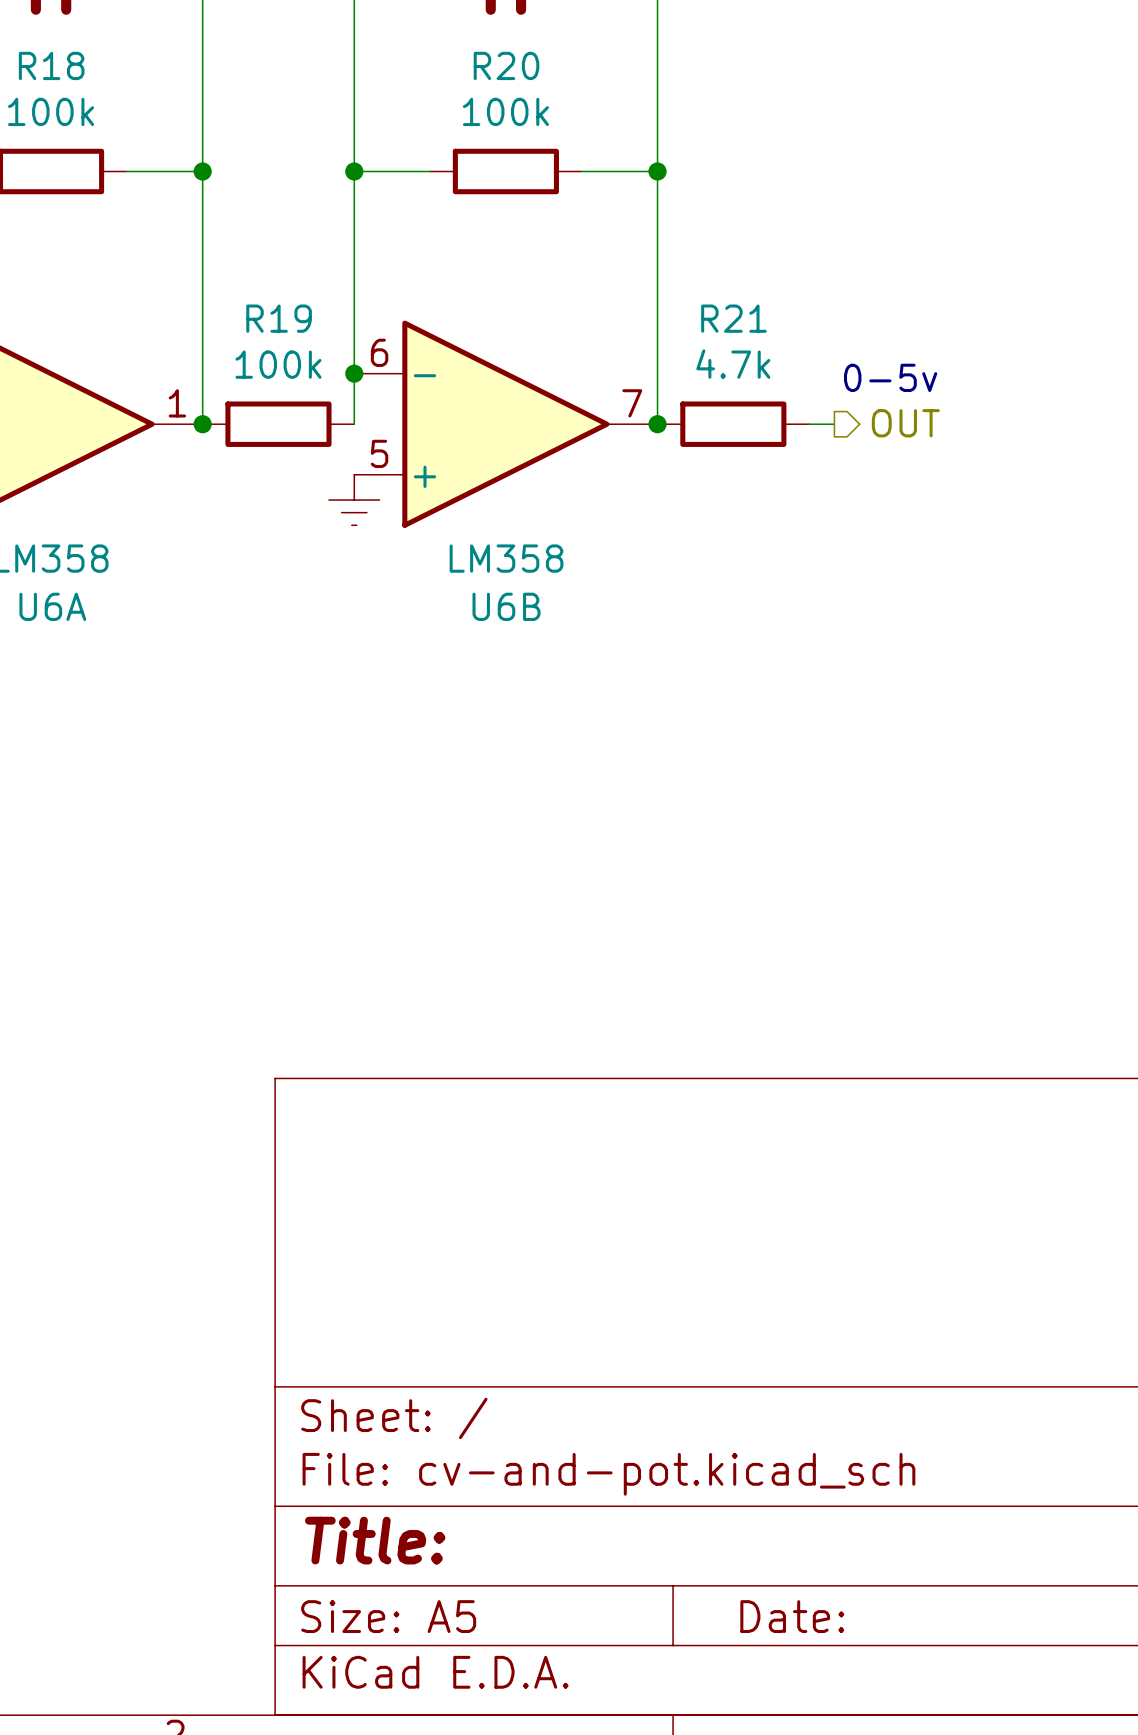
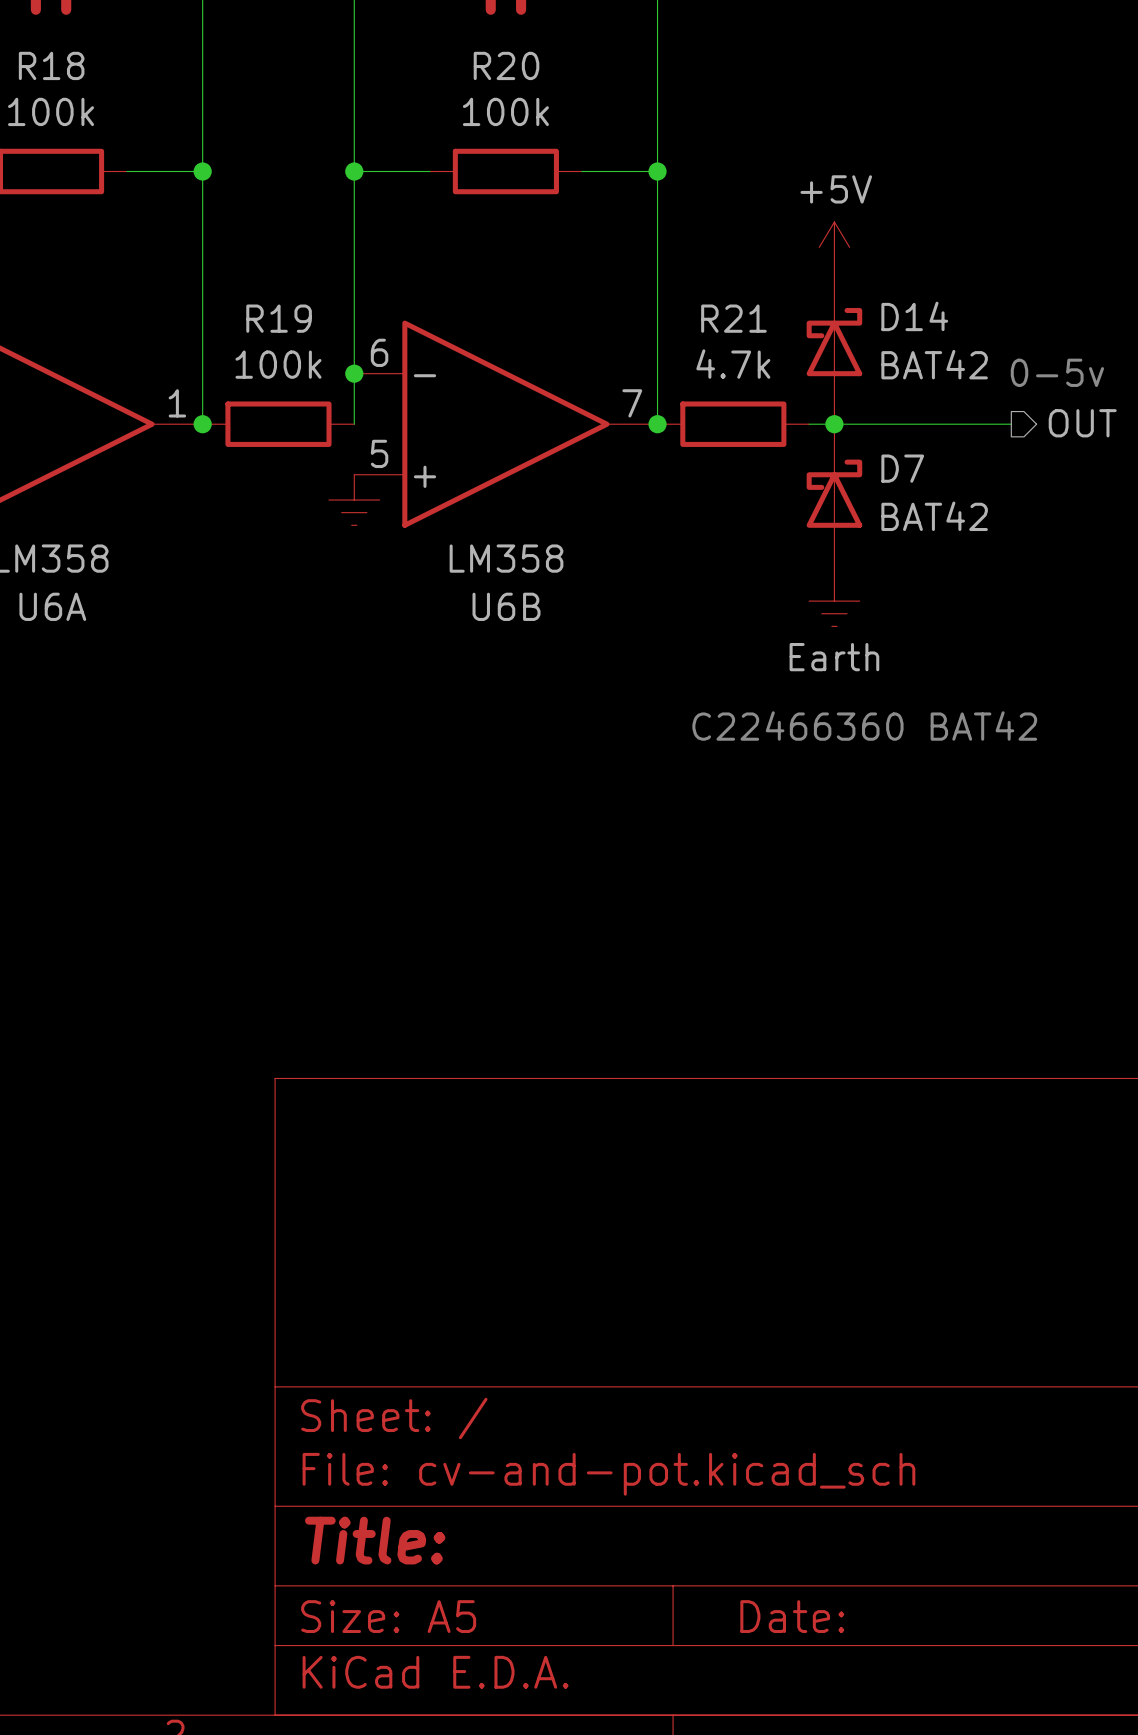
power symbol: none -> +5V (834, 247)
D14: none -> BAT42 (834, 348)
text position: 0-5v (890, 377) -> 0-5v (1057, 372)
hierarchical label position: OUT (905, 423) -> OUT (1082, 423)
wire: none -> (834, 424) (1011, 424)
junction: none -> (834, 424)
D7: none -> BAT42 (834, 500)
power symbol: none -> Earth (834, 601)
text: none -> C22466360 BAT42 (864, 725)

